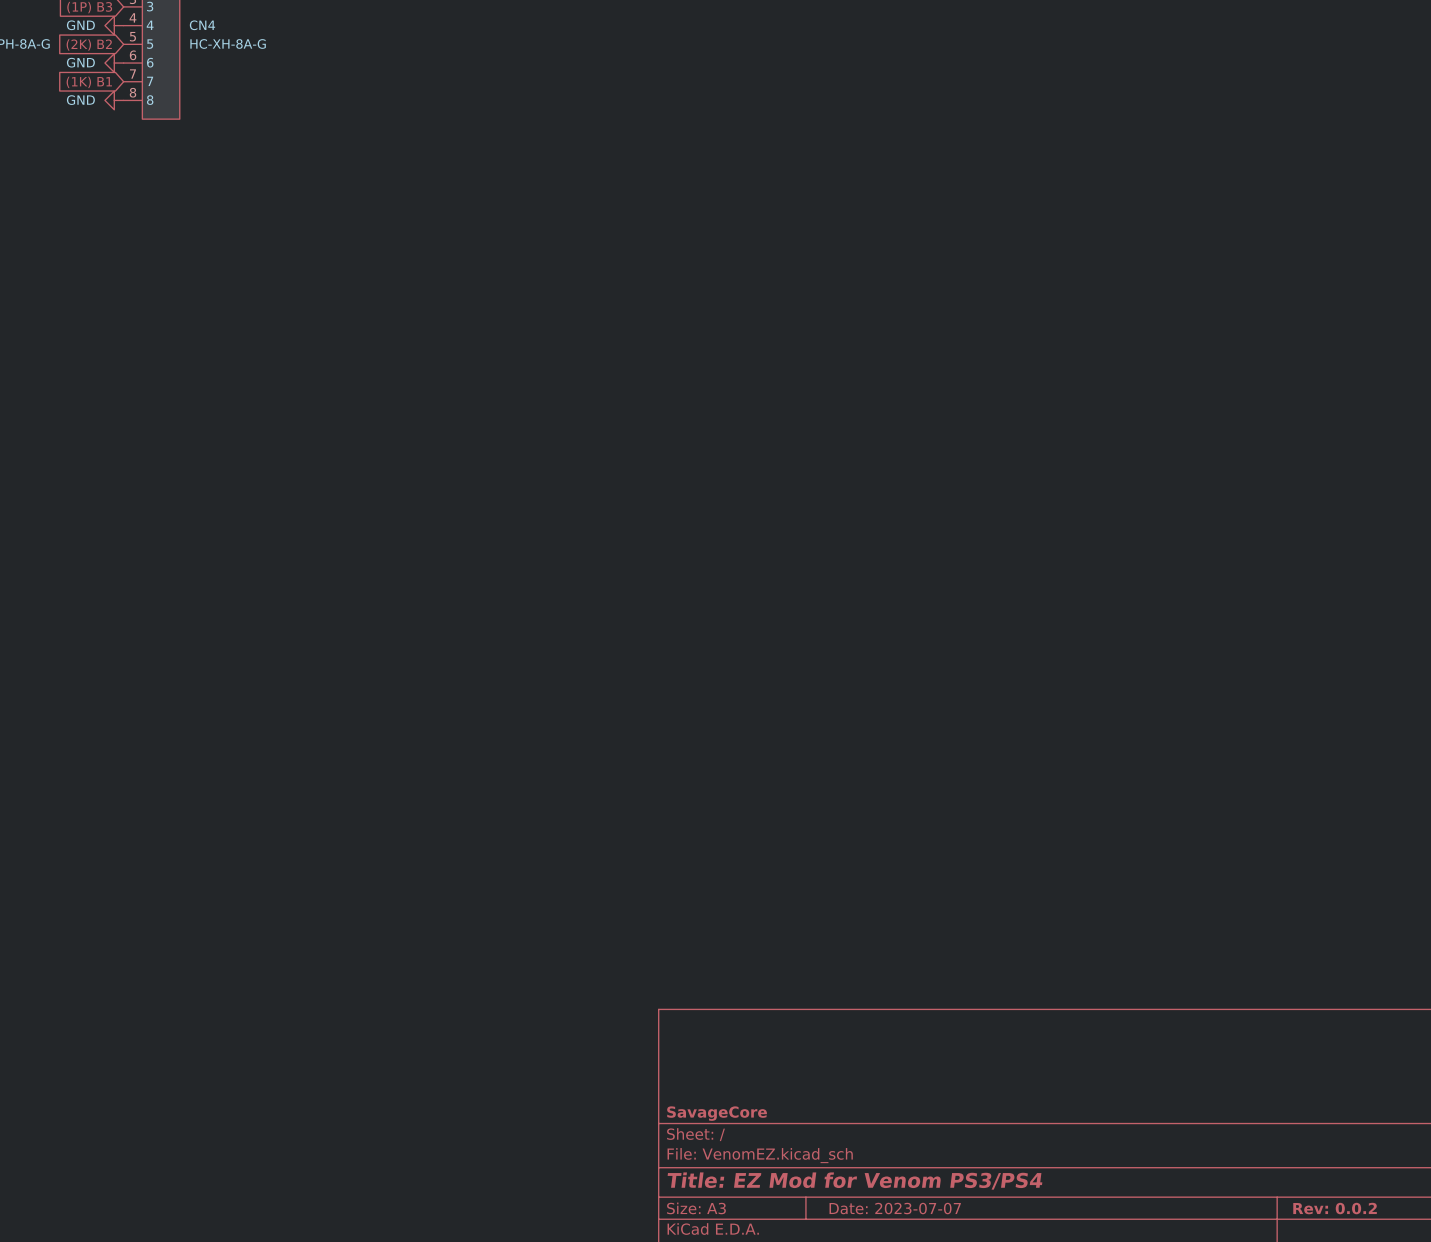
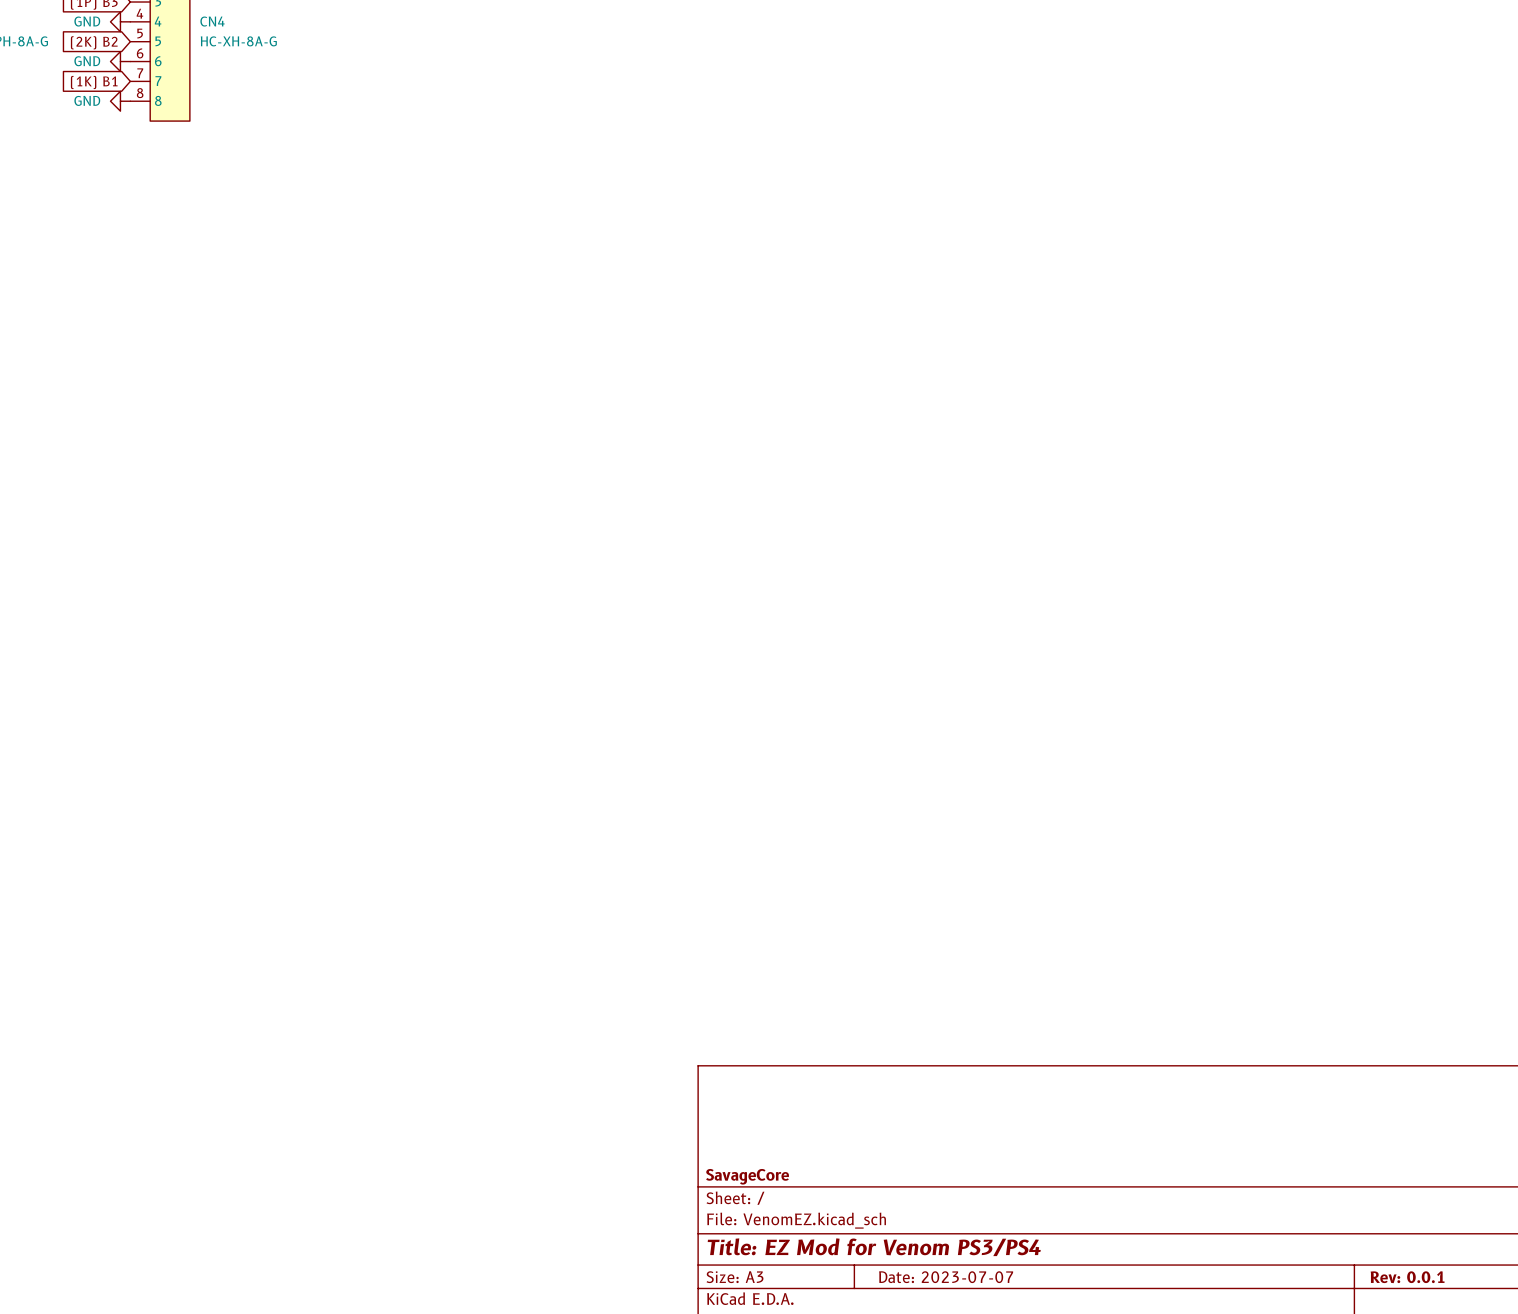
title block: Rev: 0.0.2 (1335, 1208) -> Rev: 0.0.1 (1407, 1277)

